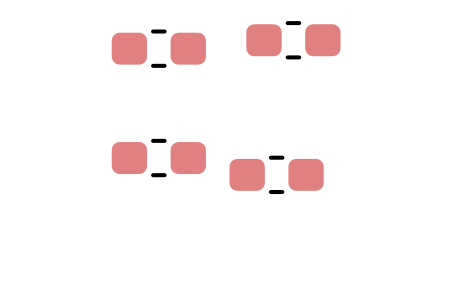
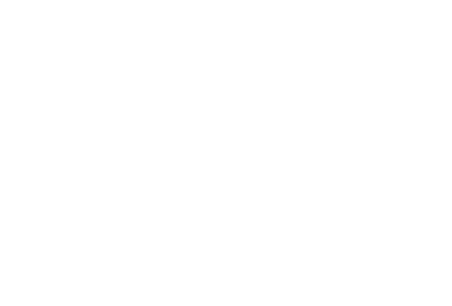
part: (293, 40) -> none
part: (158, 48) -> none
part: (158, 158) -> none
part: (276, 174) -> none

